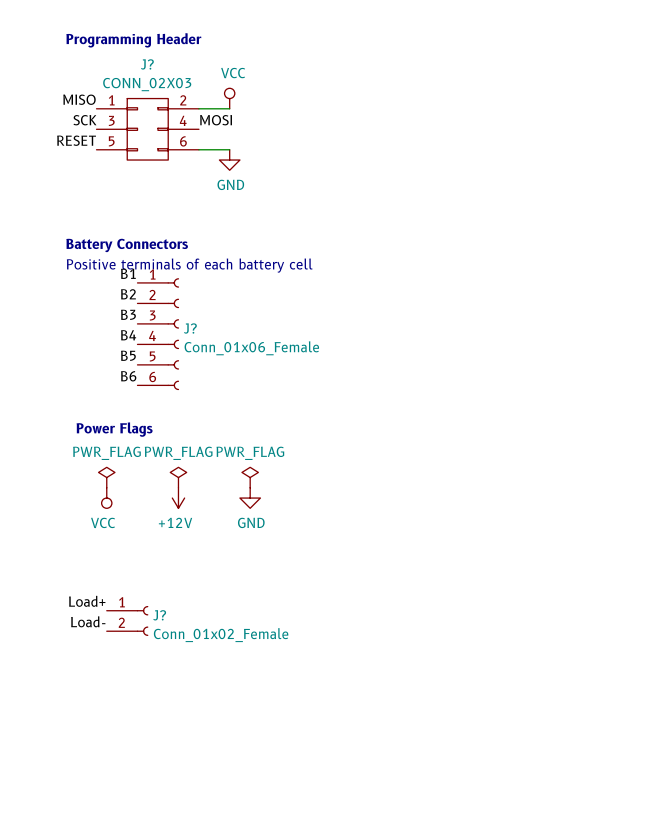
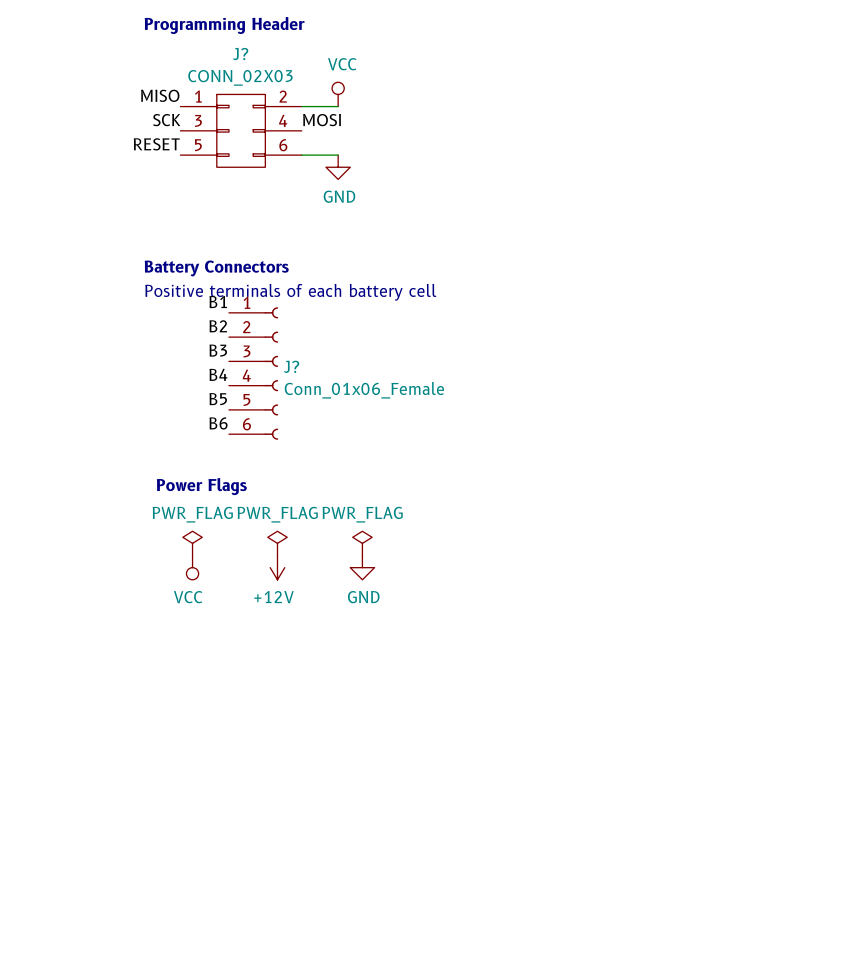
label: Load+ (87, 601) -> none
J?: Conn_01x02_Female (127, 620) -> none
label: Load- (88, 621) -> none

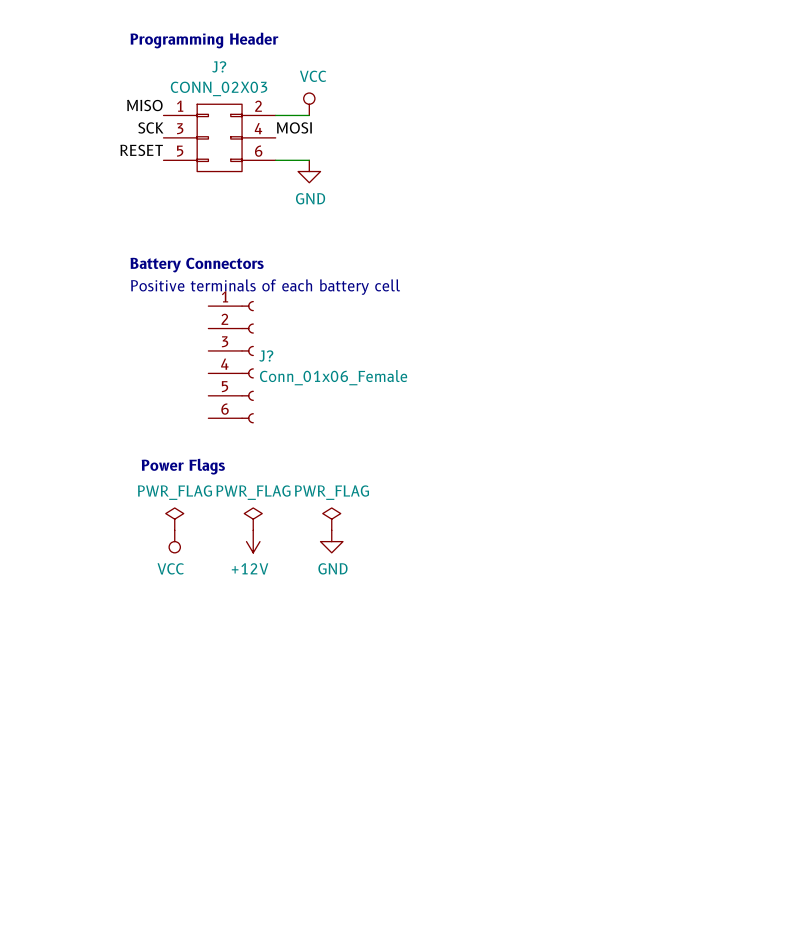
label: B1 (218, 302) -> none
label: B2 (218, 326) -> none
label: B3 (218, 350) -> none
label: B4 (218, 374) -> none
label: B5 (218, 399) -> none
label: B6 (218, 423) -> none

